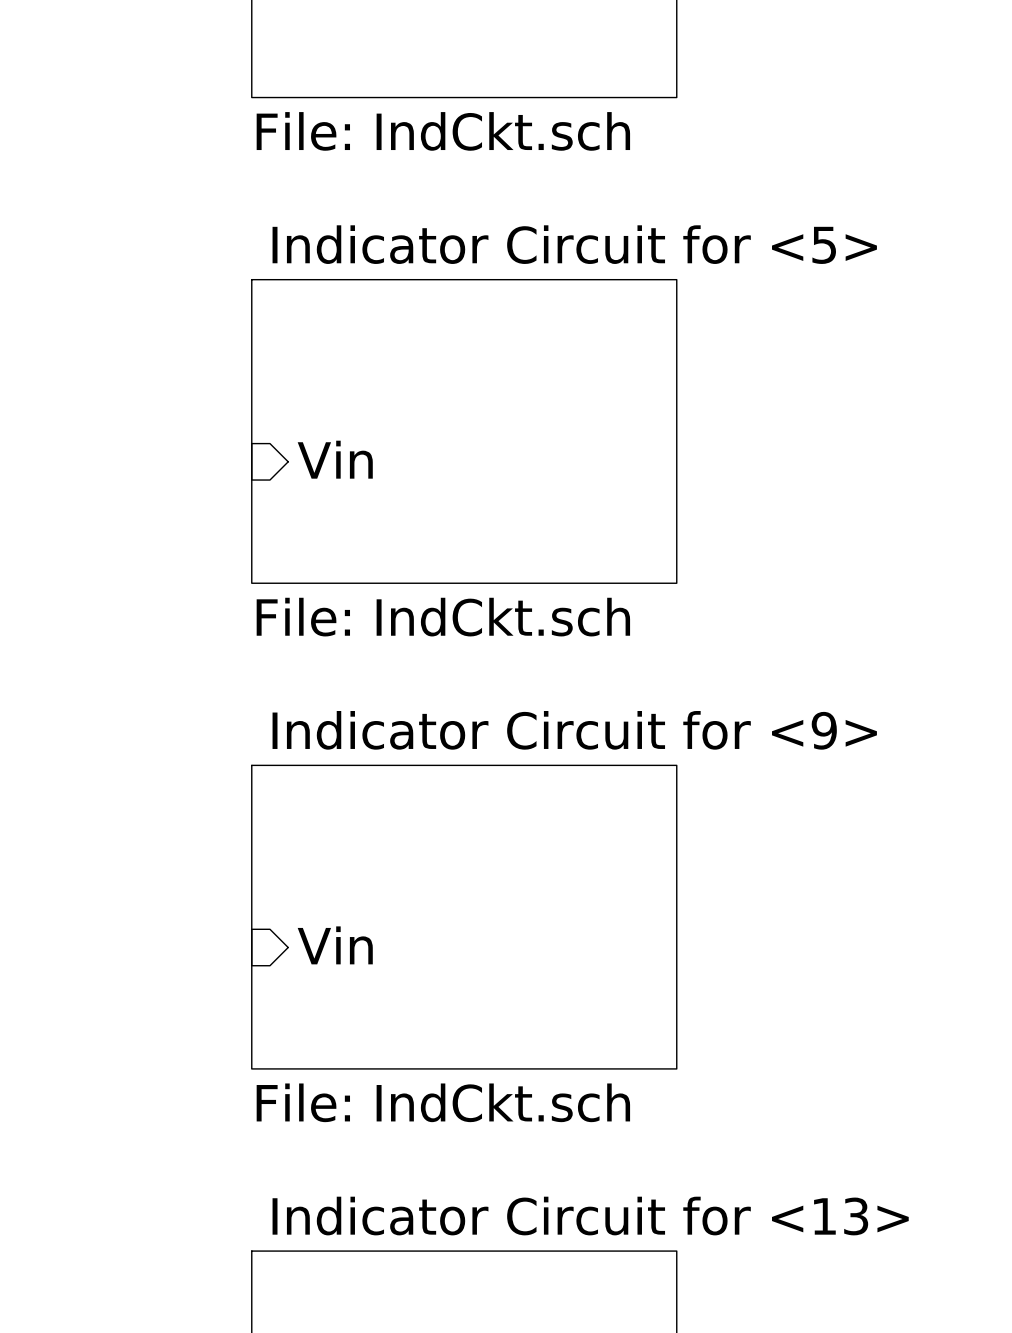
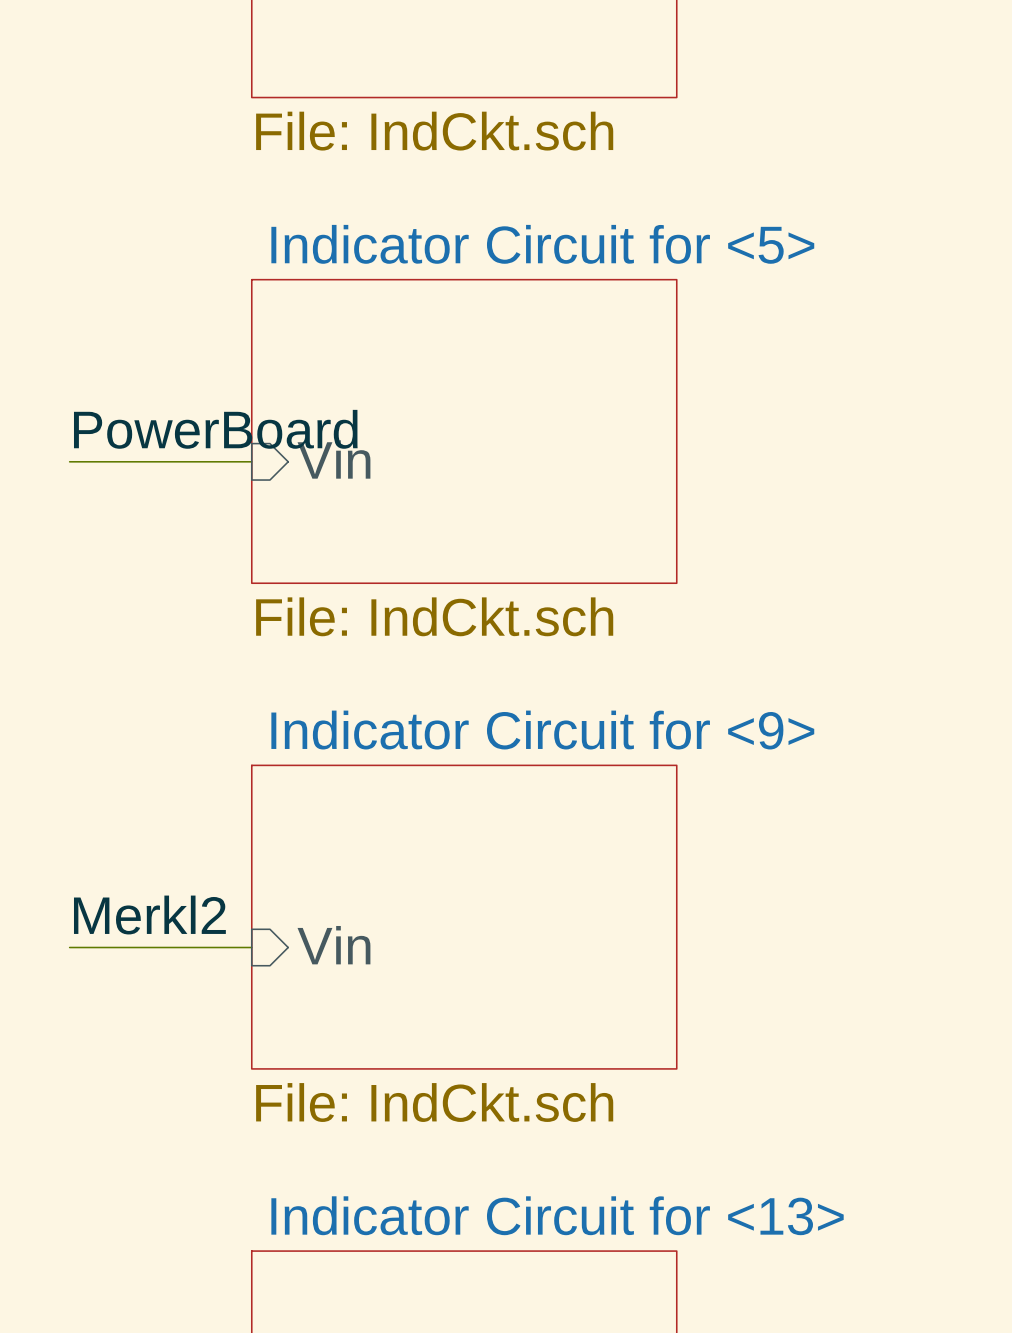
label: none -> PowerBoard (215, 429)
wire: none -> (69, 461) (251, 461)
label: none -> Merkl2 (149, 915)
wire: none -> (69, 947) (251, 947)

